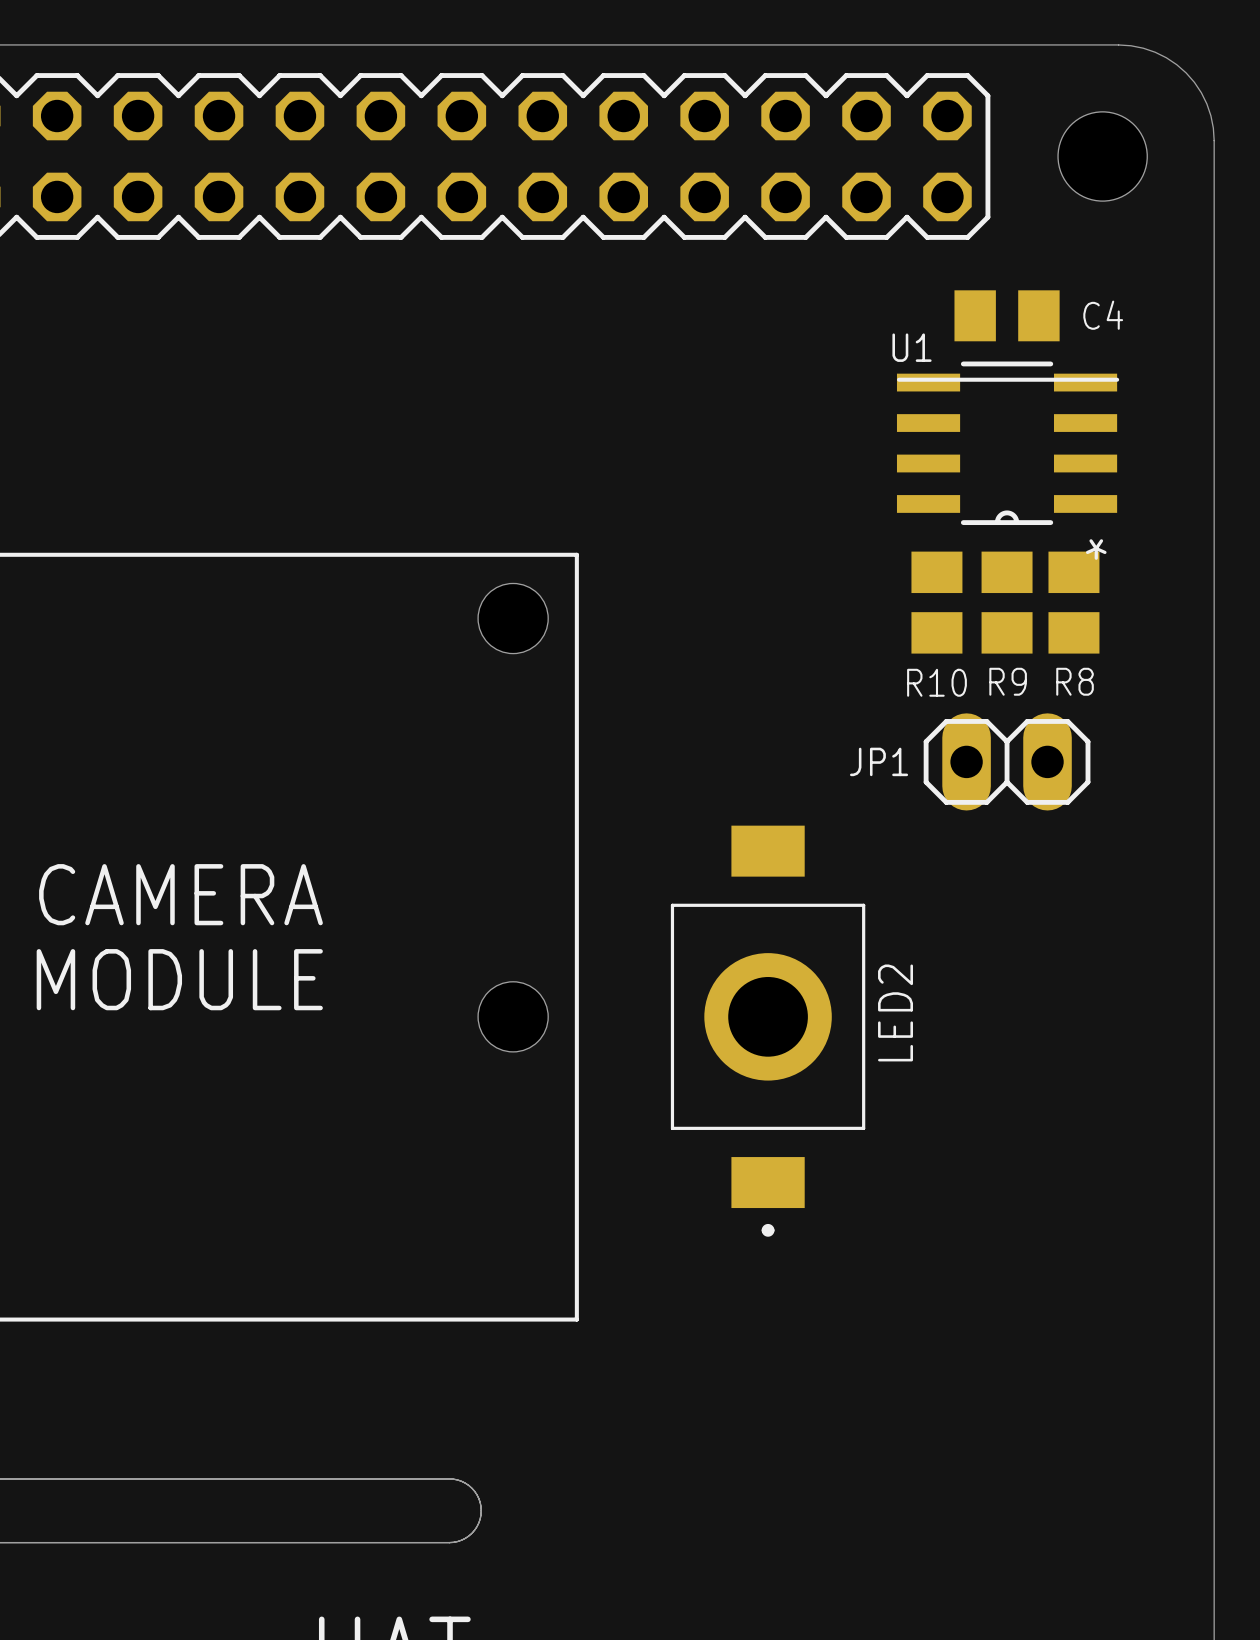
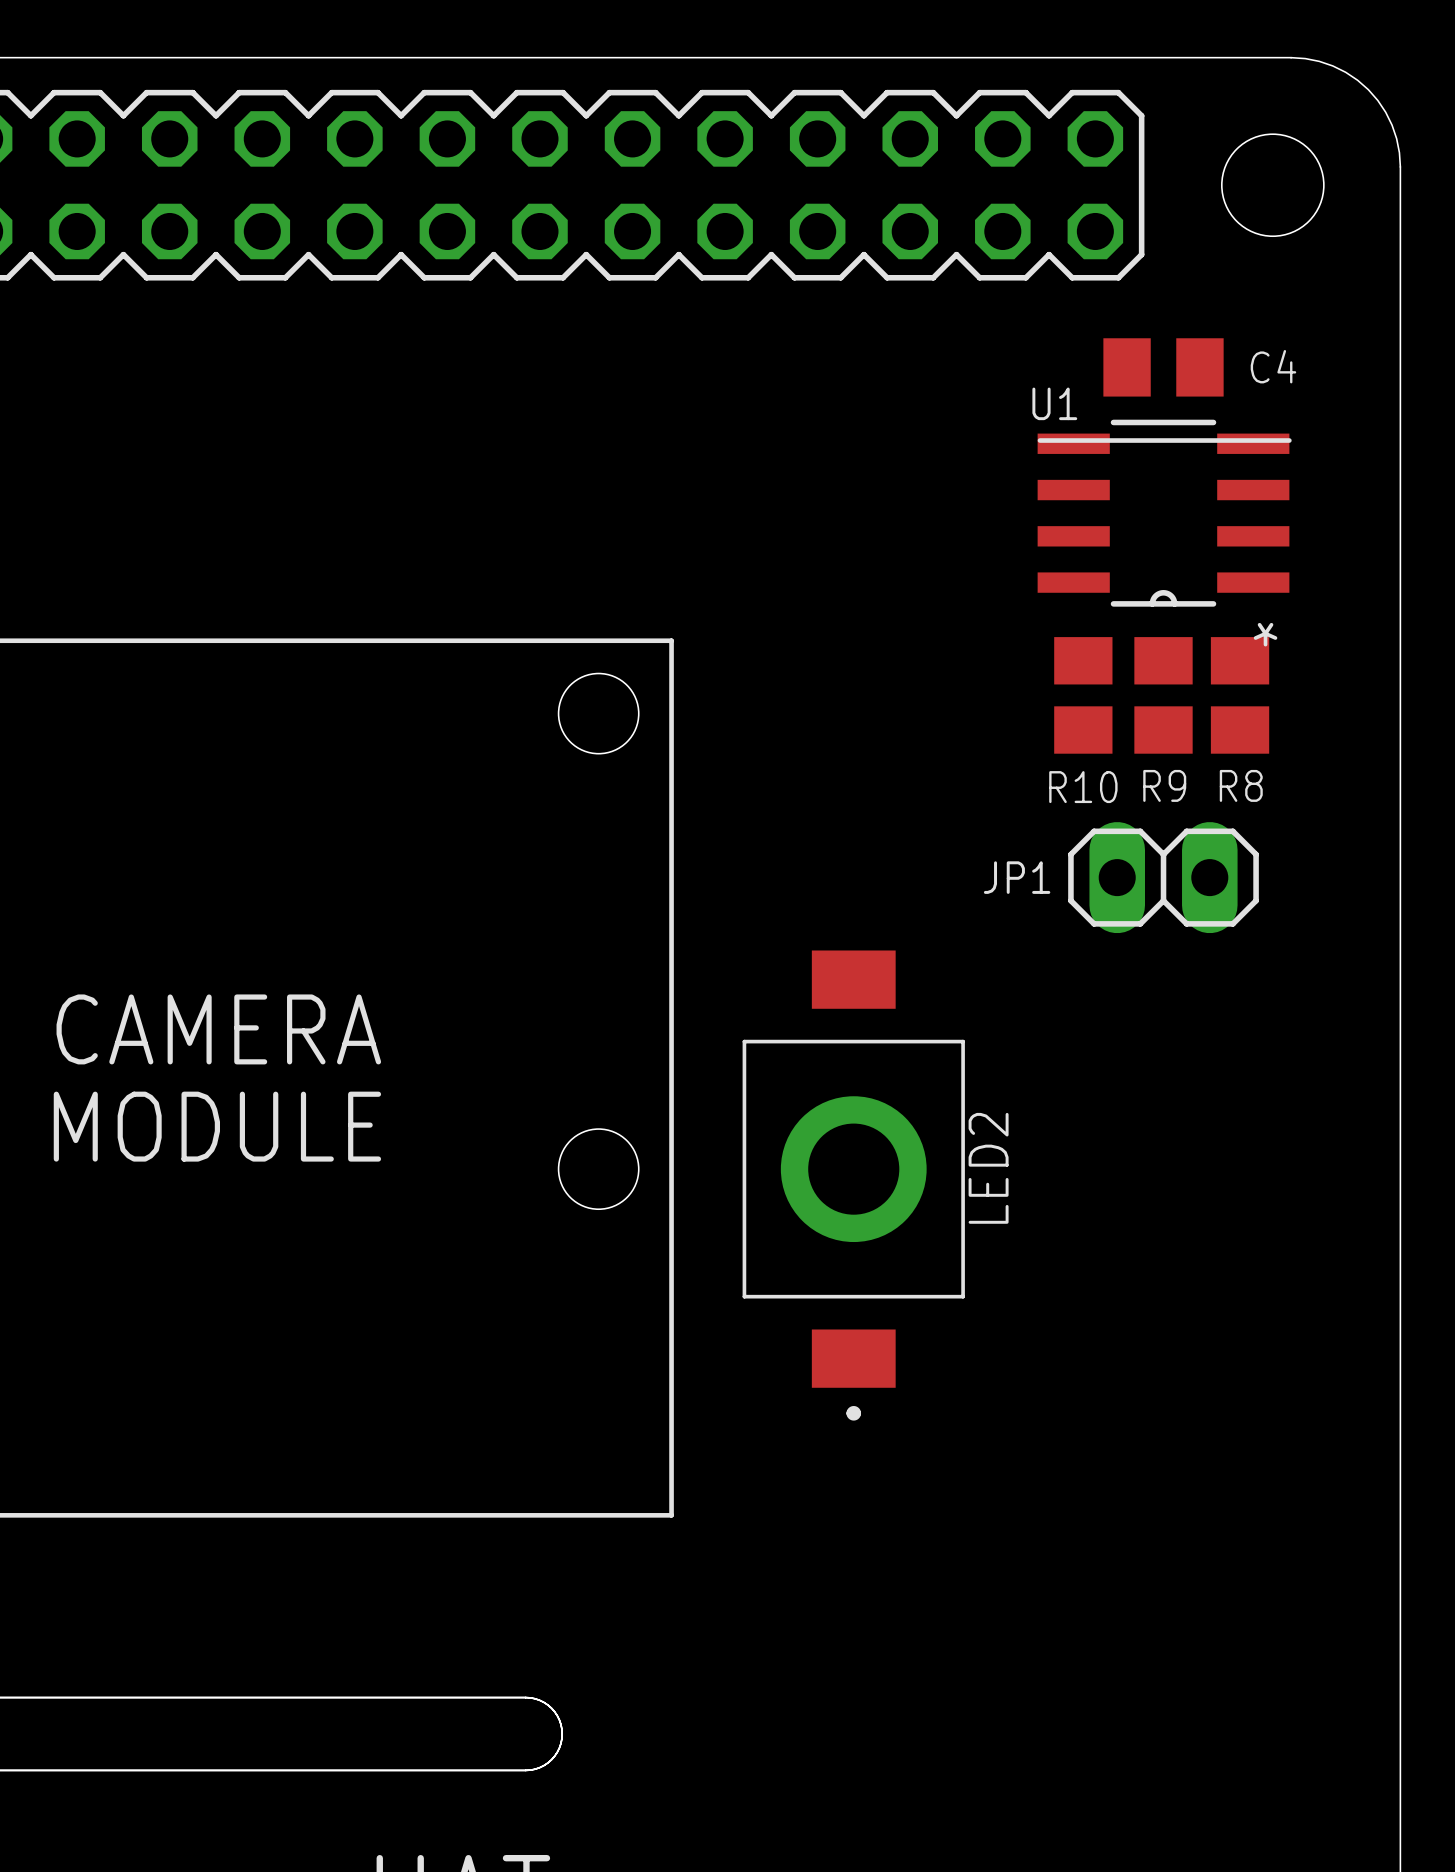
LED2 name position: LED2 (895, 1012) -> LED2 (988, 1168)
LED2 position: (768, 1031) -> (853, 1185)

